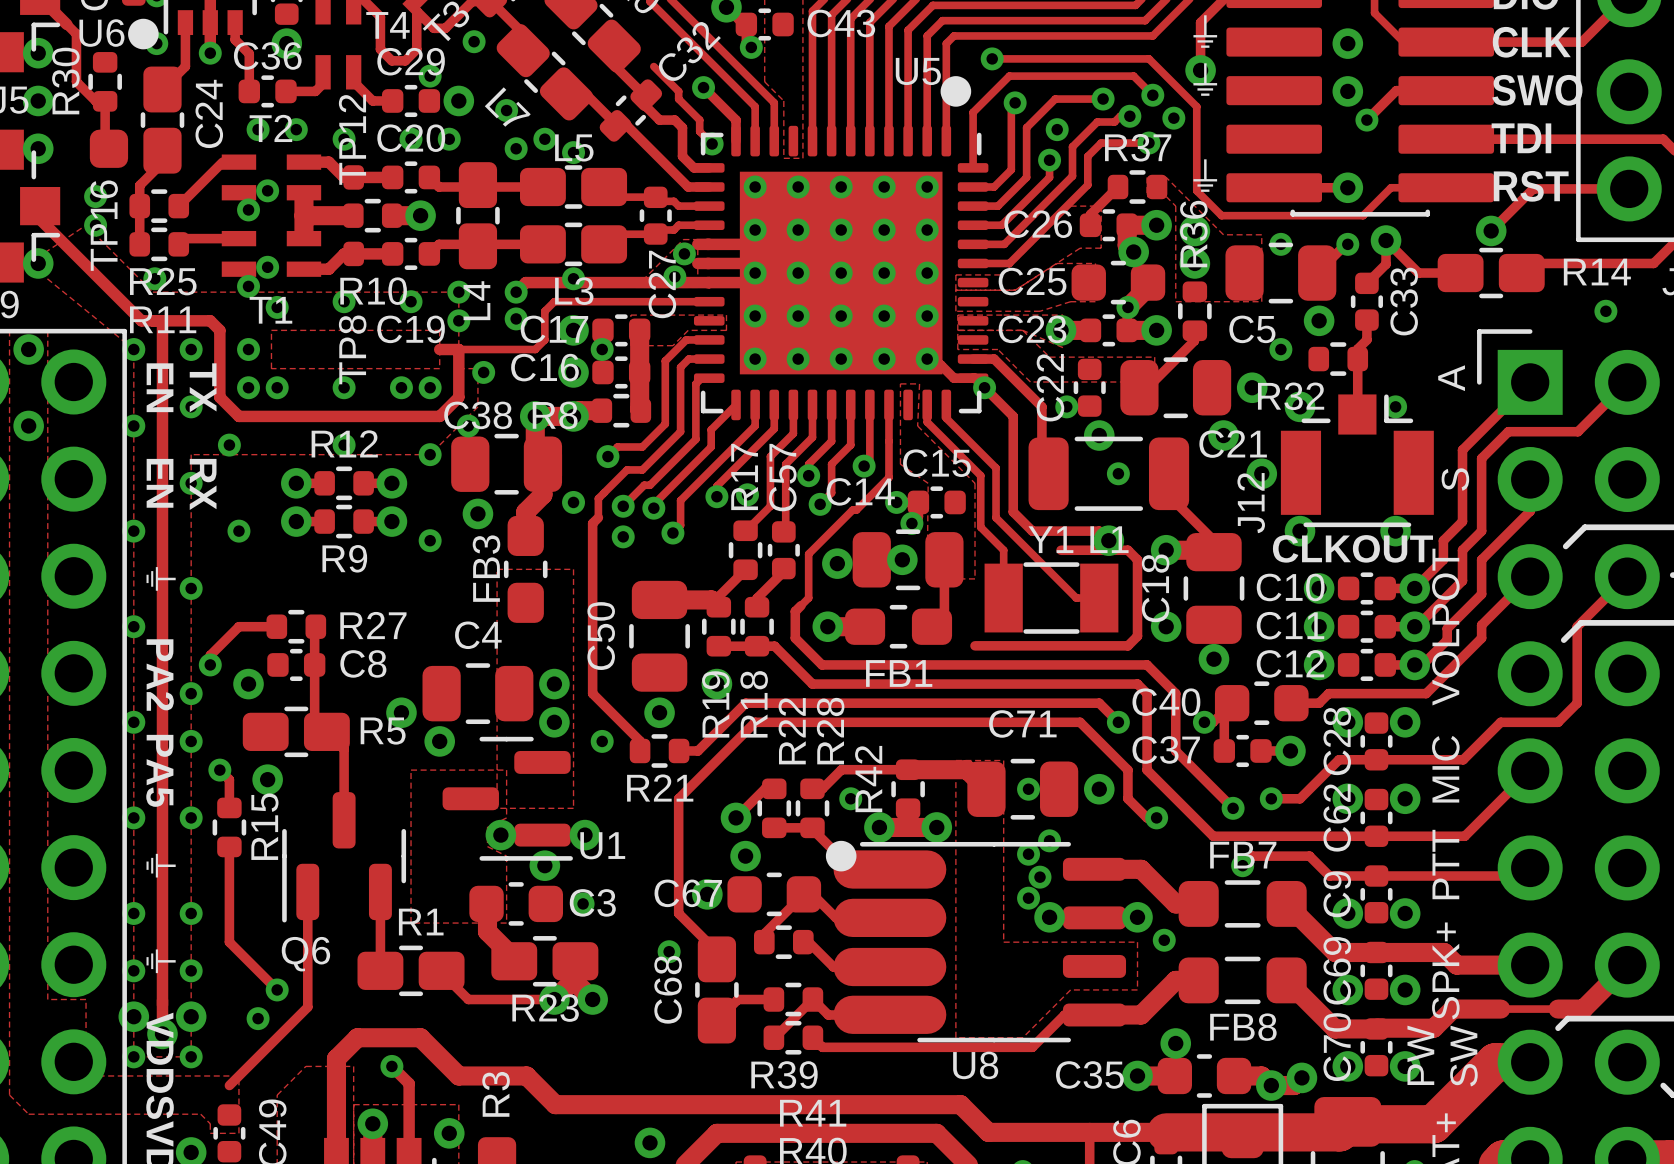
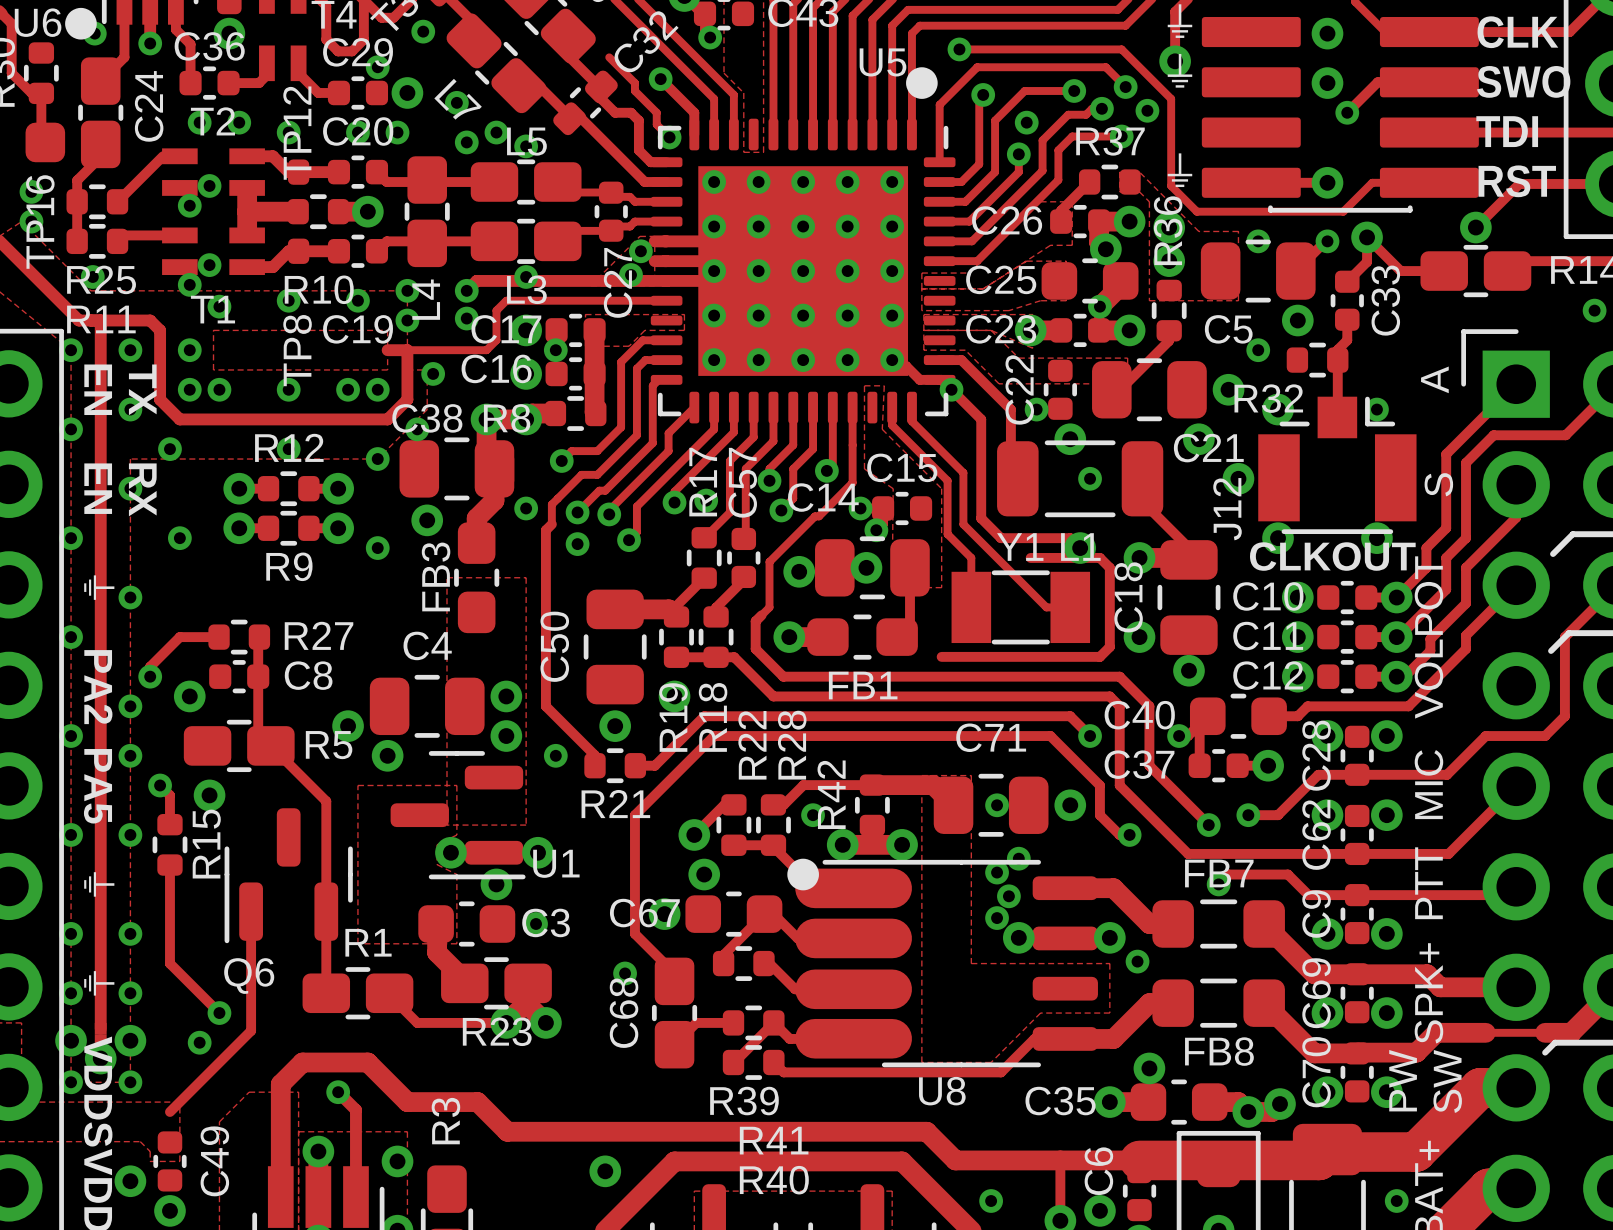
top track: (344, 749) (344, 820) -> (288, 763) (326, 801) (326, 911)

